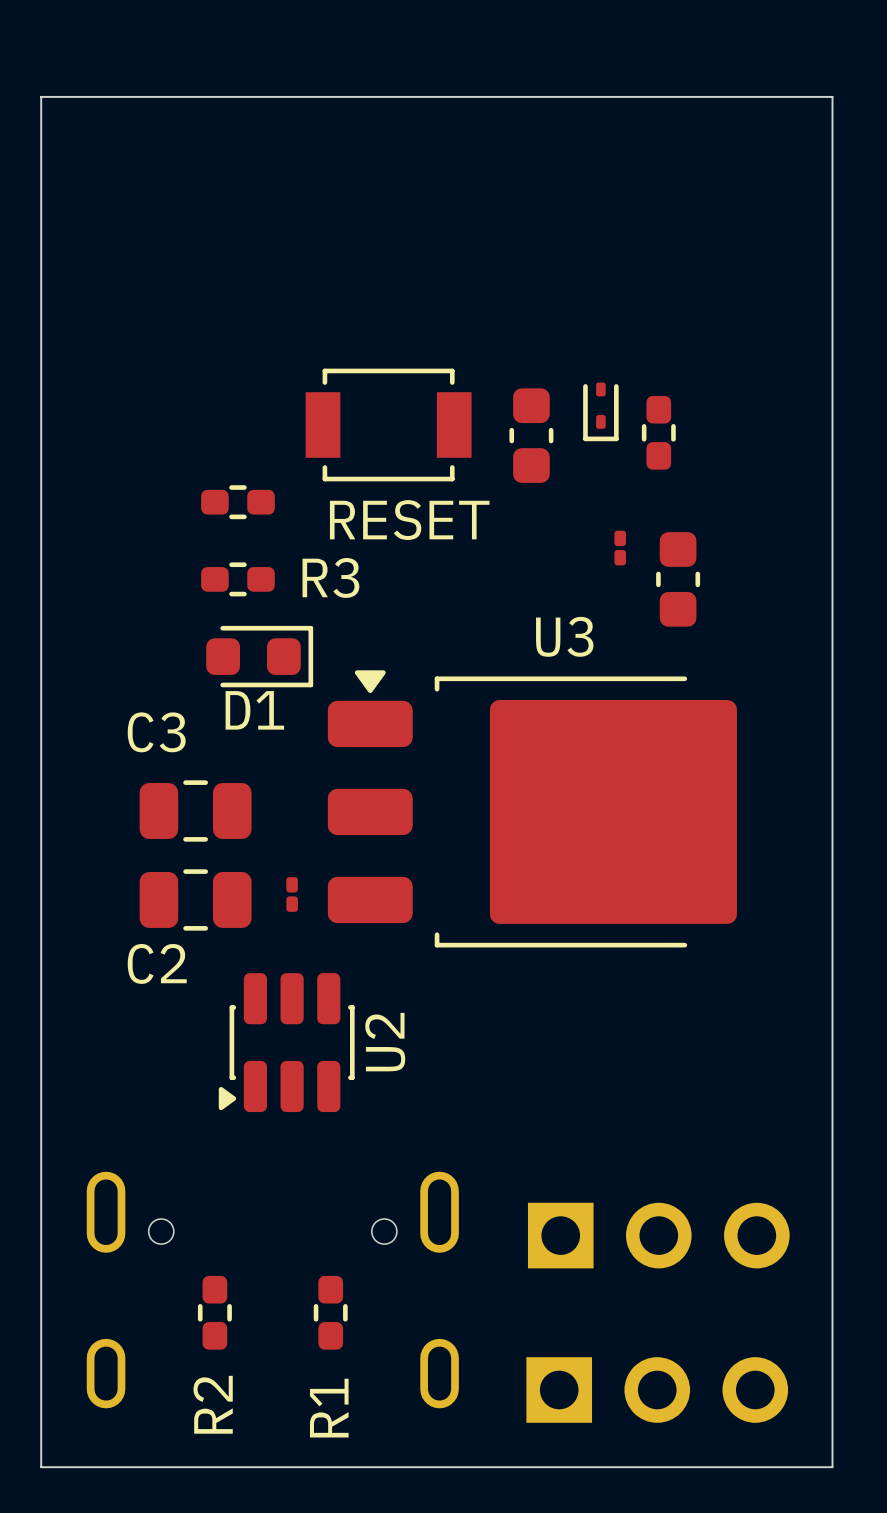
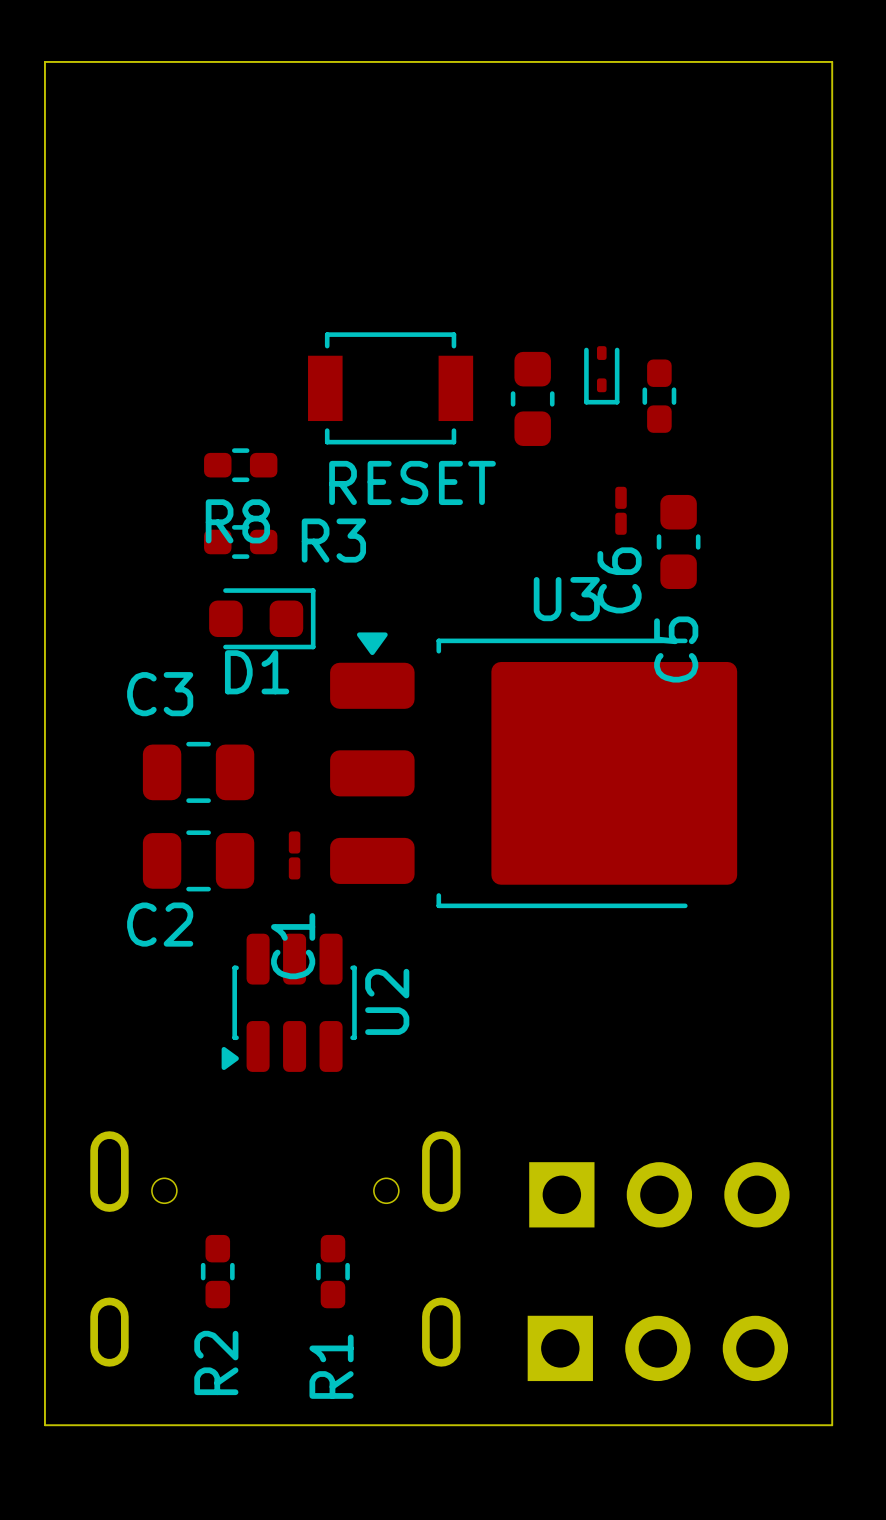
part: (620, 548) -> none
C6: none -> (620, 510)
R8 name: none -> R8 (237, 521)
C5 name: none -> C5 (676, 649)
part: (292, 894) -> none
C1: none -> (294, 855)

